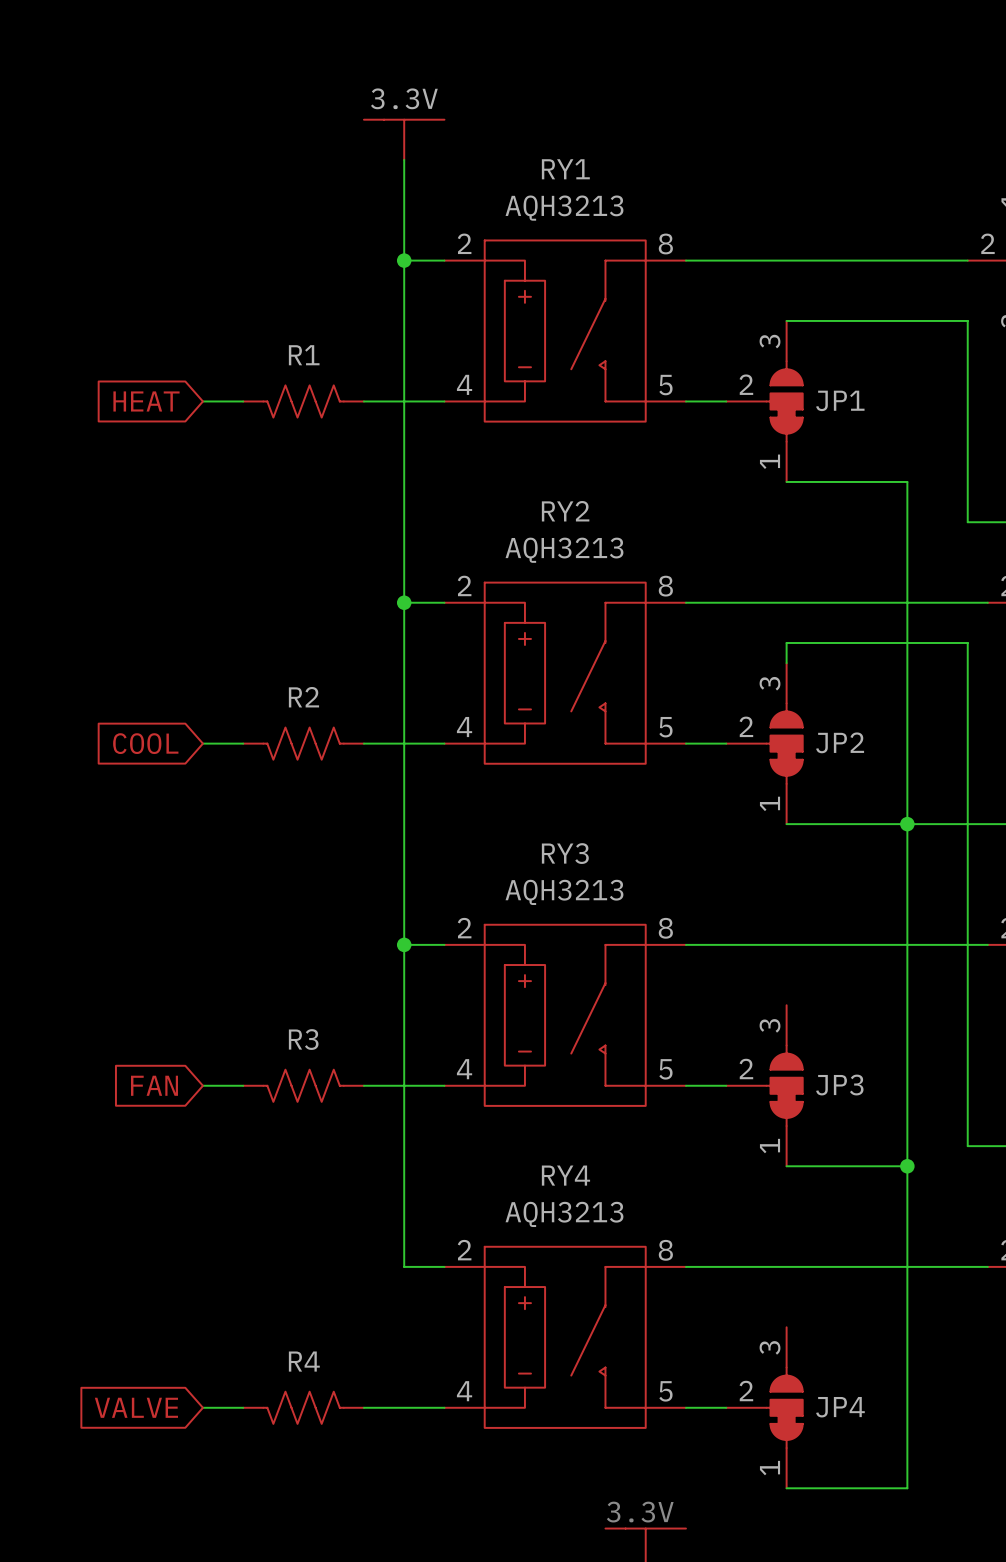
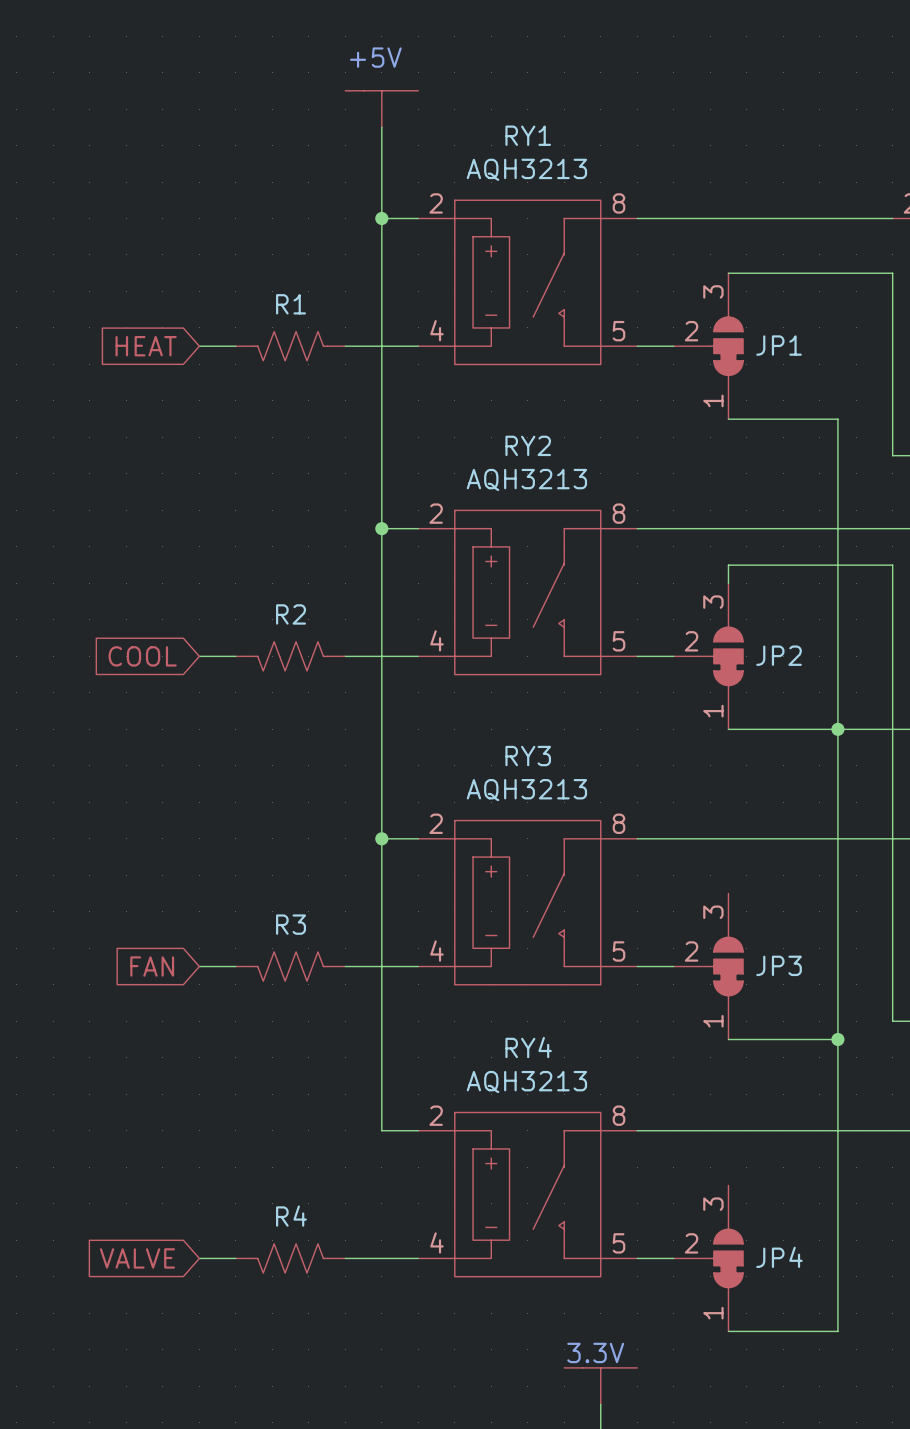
text: none -> +5V (375, 57)
part value: 3.3V (404, 98) -> none

